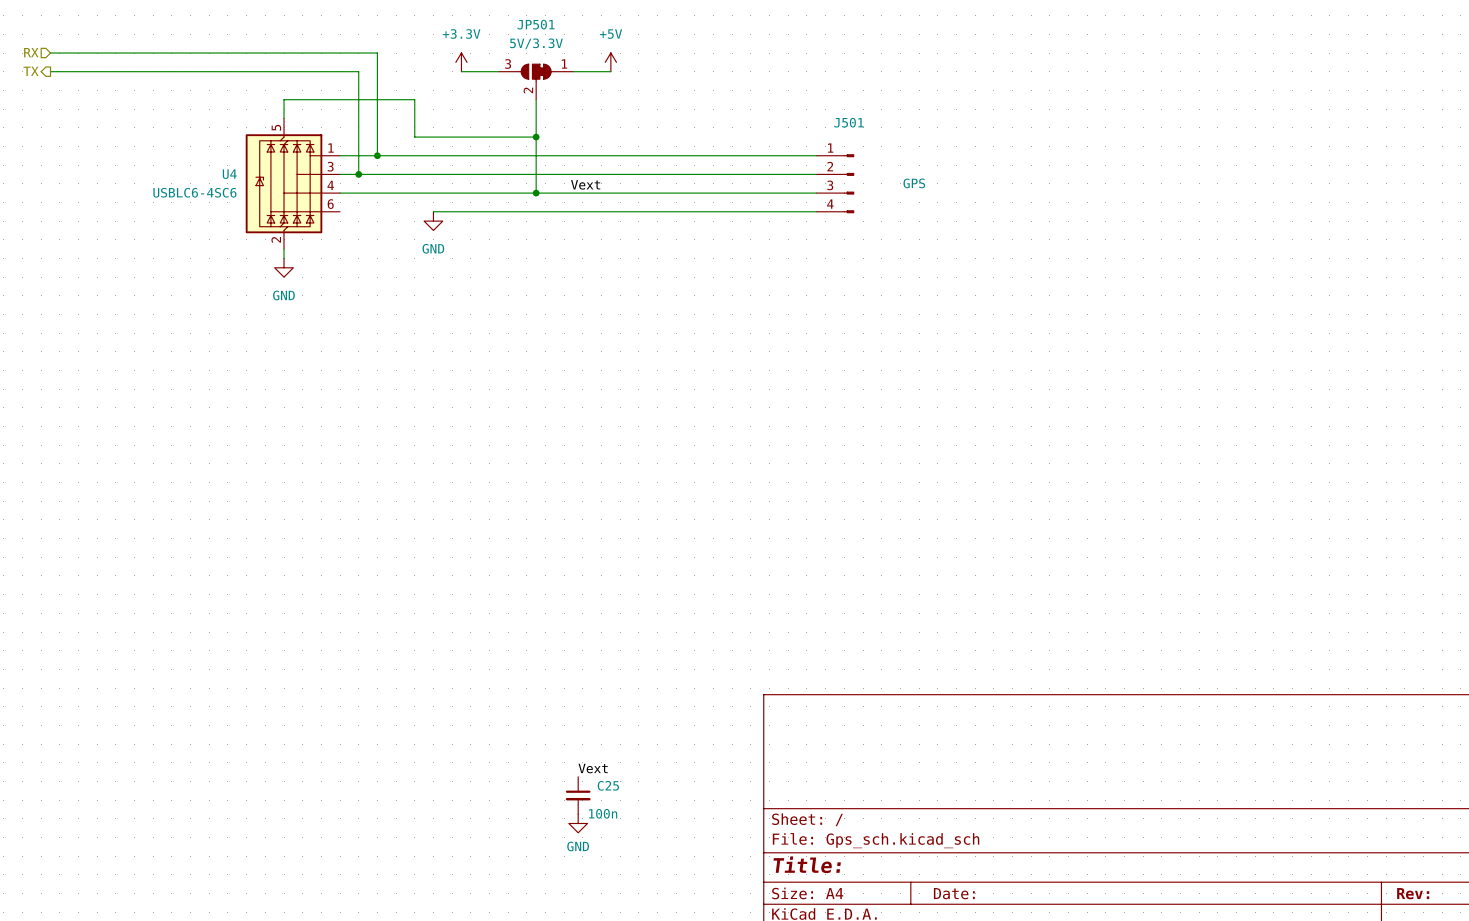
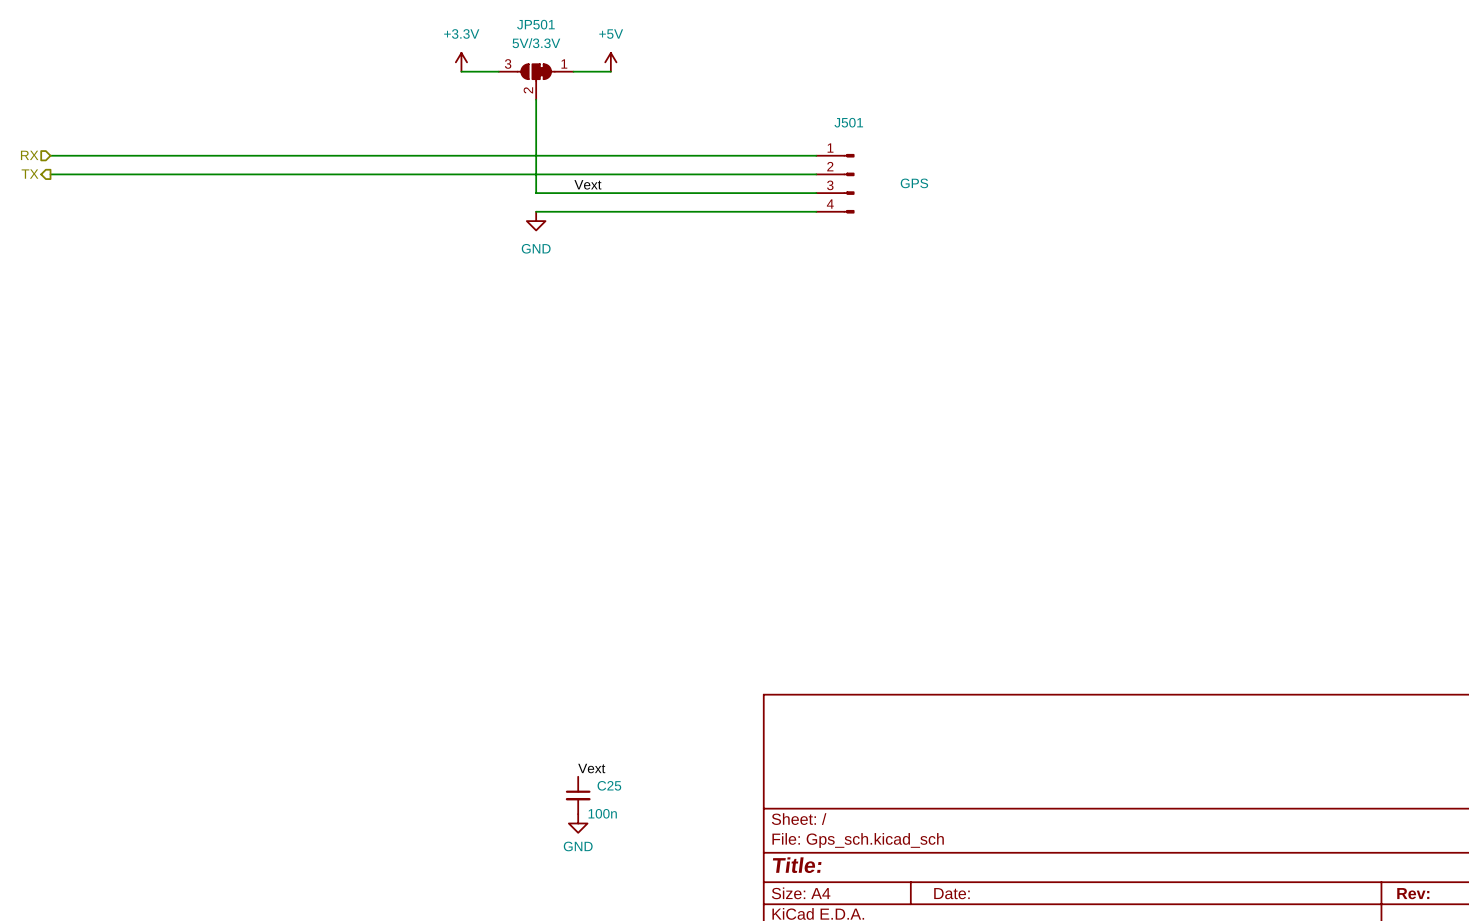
hierarchical label position: RX (31, 52) -> RX (29, 155)
wire: (50, 53) (377, 53) (377, 155) -> none
hierarchical label position: TX (31, 71) -> TX (30, 174)
wire: (50, 71) (358, 71) (358, 174) -> none
wire: (284, 118) (284, 99) (414, 99) (414, 137) (536, 137) -> none
junction: (536, 137) -> none
wire: none -> (50, 155) (340, 155)
junction: (377, 155) -> none
wire: none -> (50, 174) (340, 174)
junction: (358, 174) -> none
U4: USBLC6-4SC6 (292, 183) -> none
wire: (340, 193) (536, 193) -> none
junction: (536, 193) -> none
wire: (433, 211) (536, 211) -> none
power symbol position: GND (433, 221) -> GND (536, 221)
wire: (284, 249) (284, 258) -> none
power symbol: GND (284, 267) -> none

